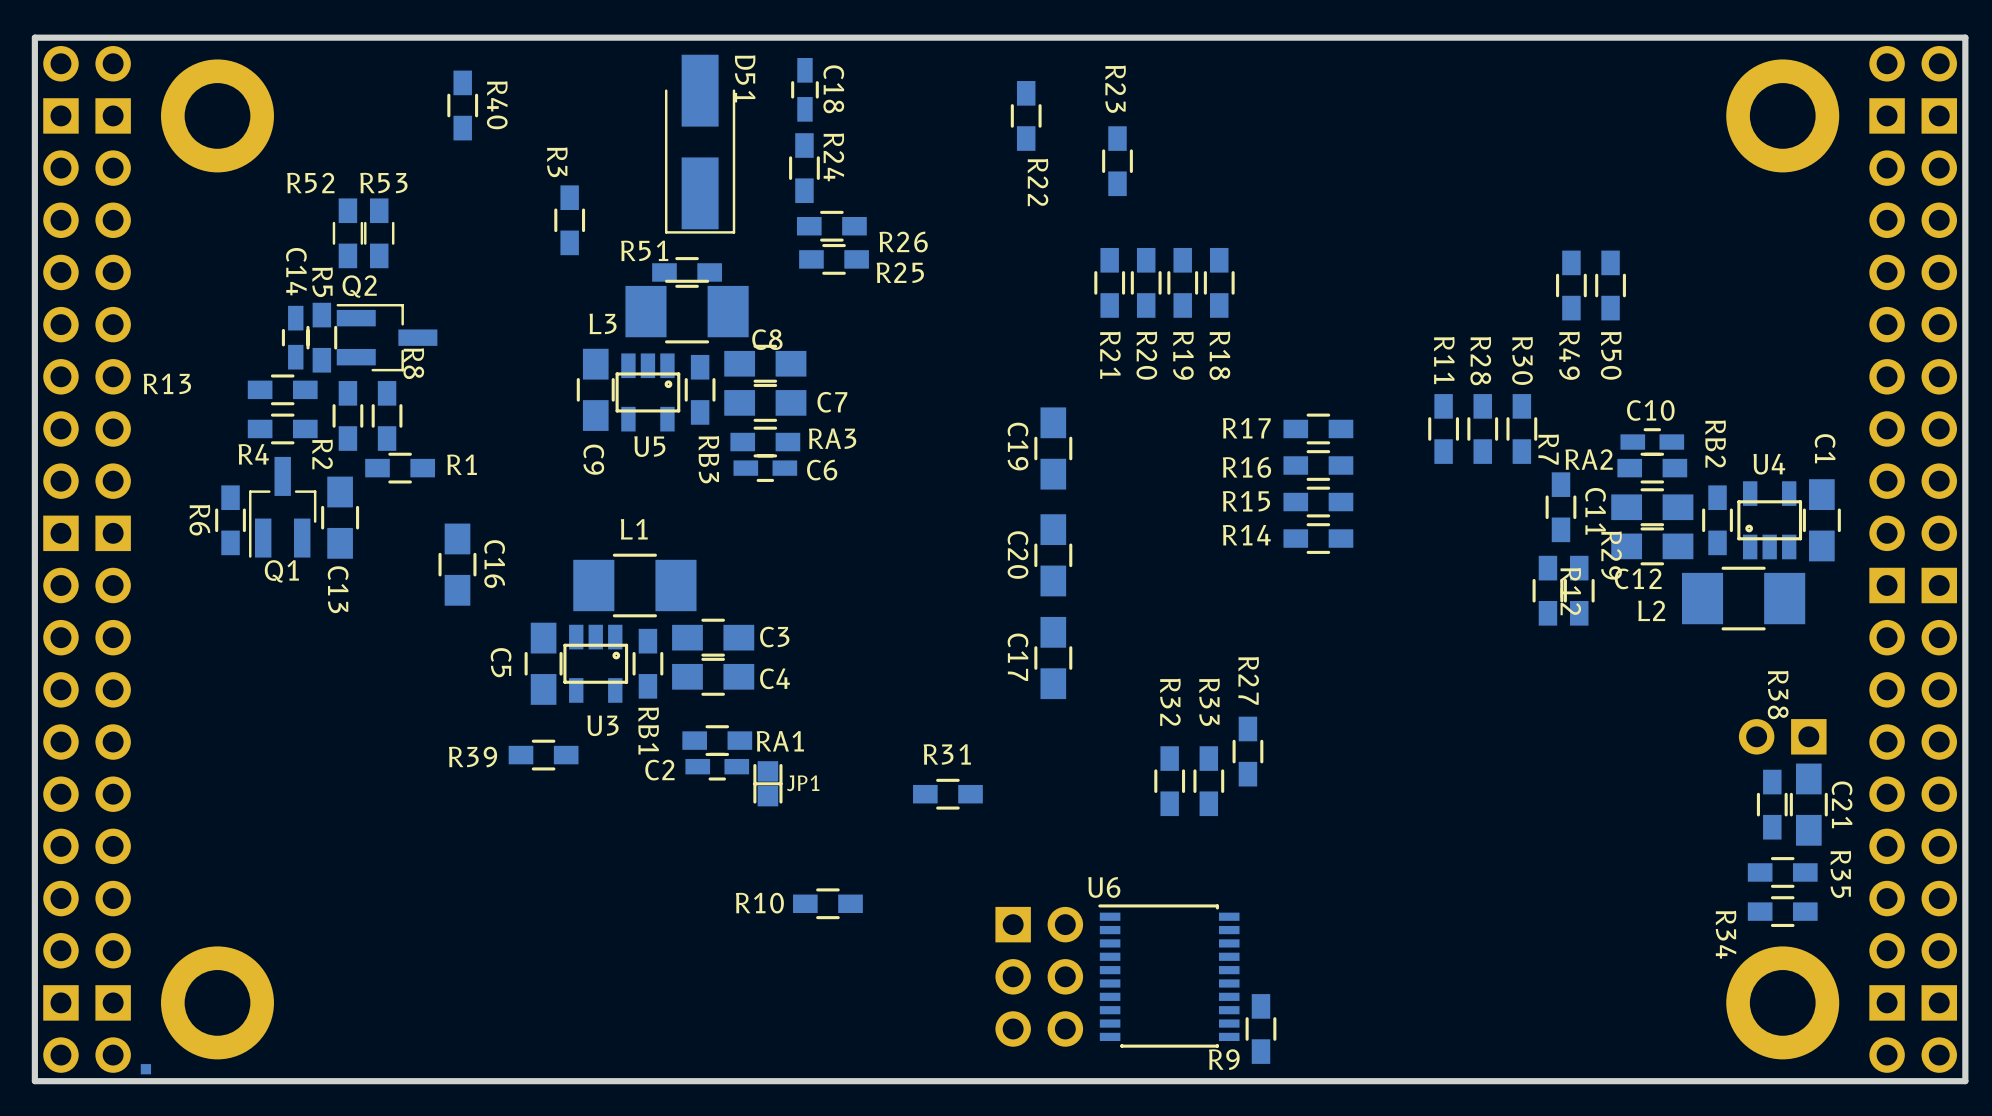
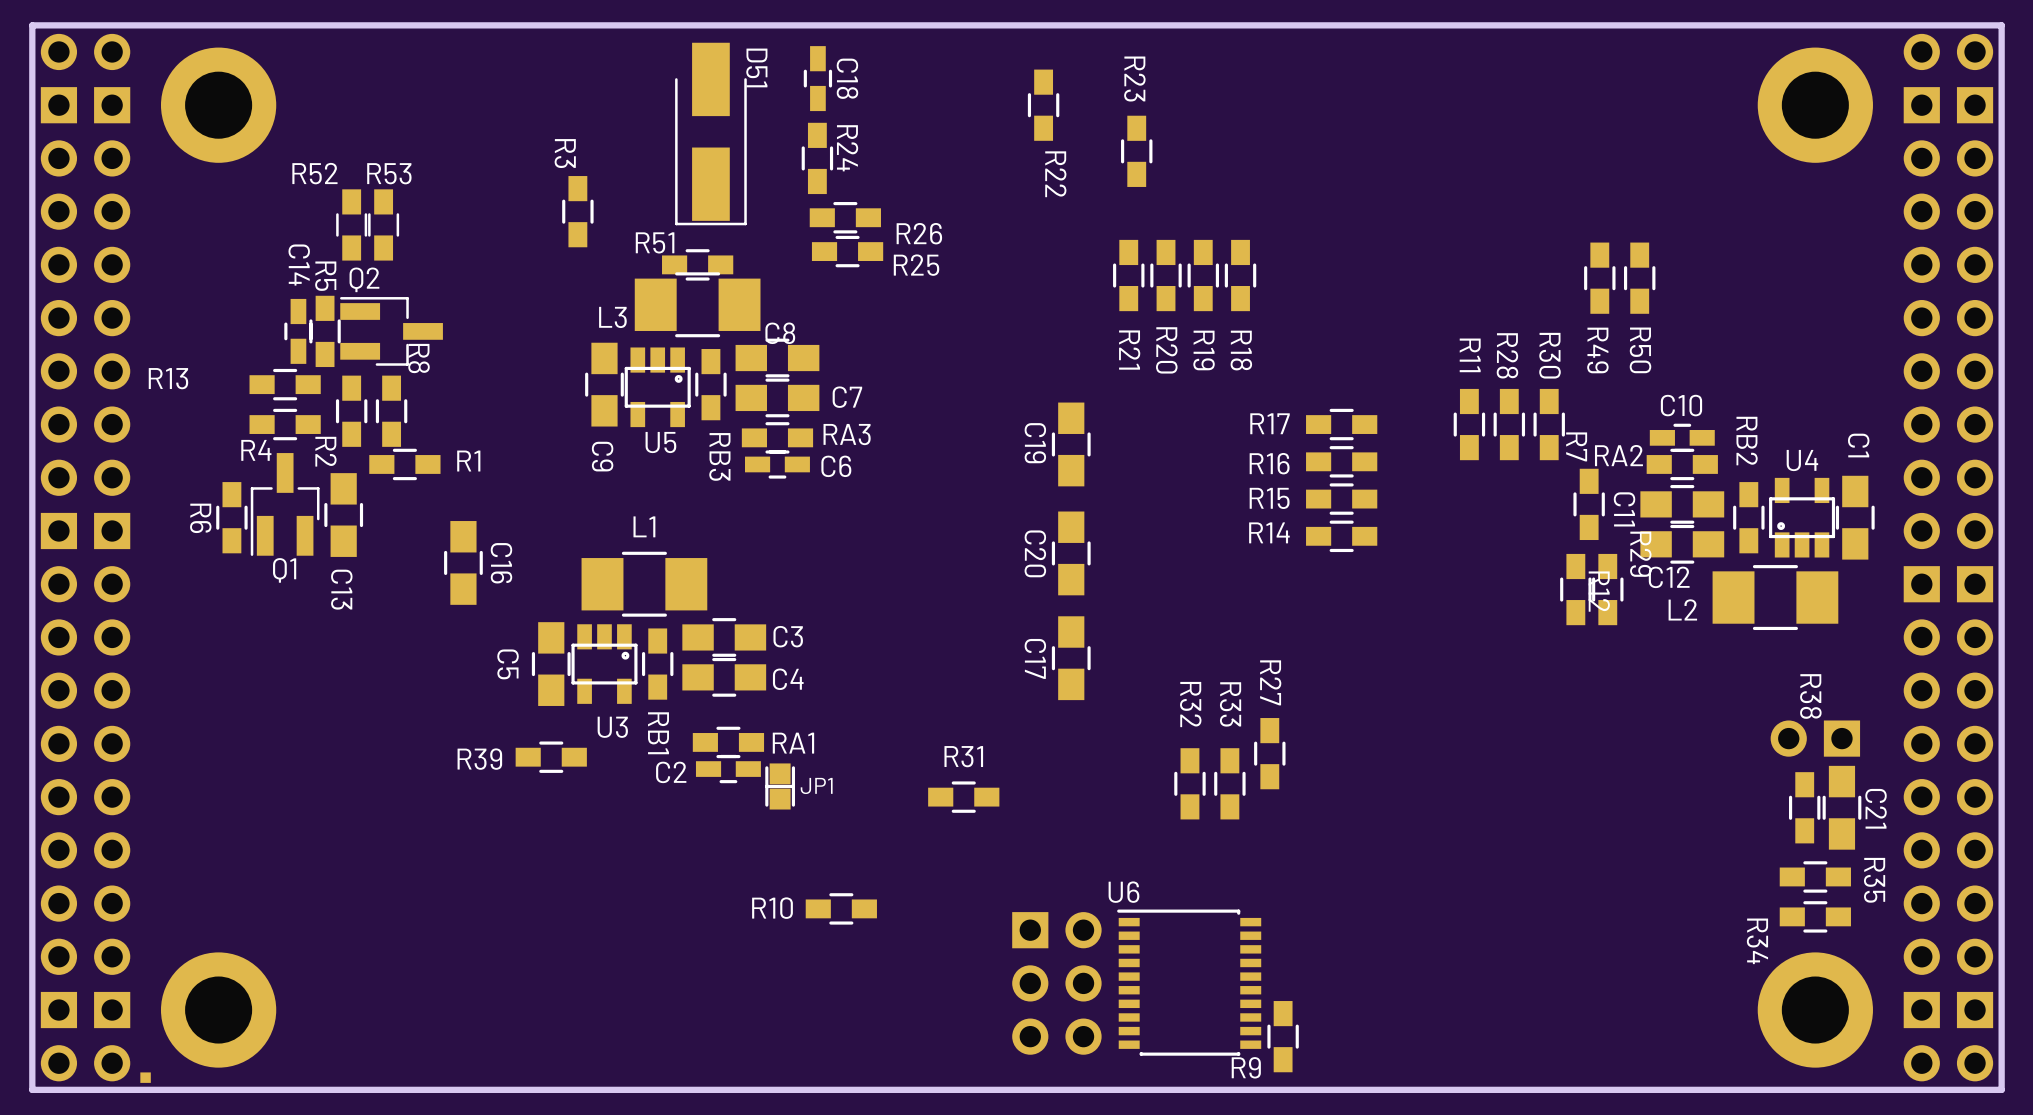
R40: (462, 105) -> none

